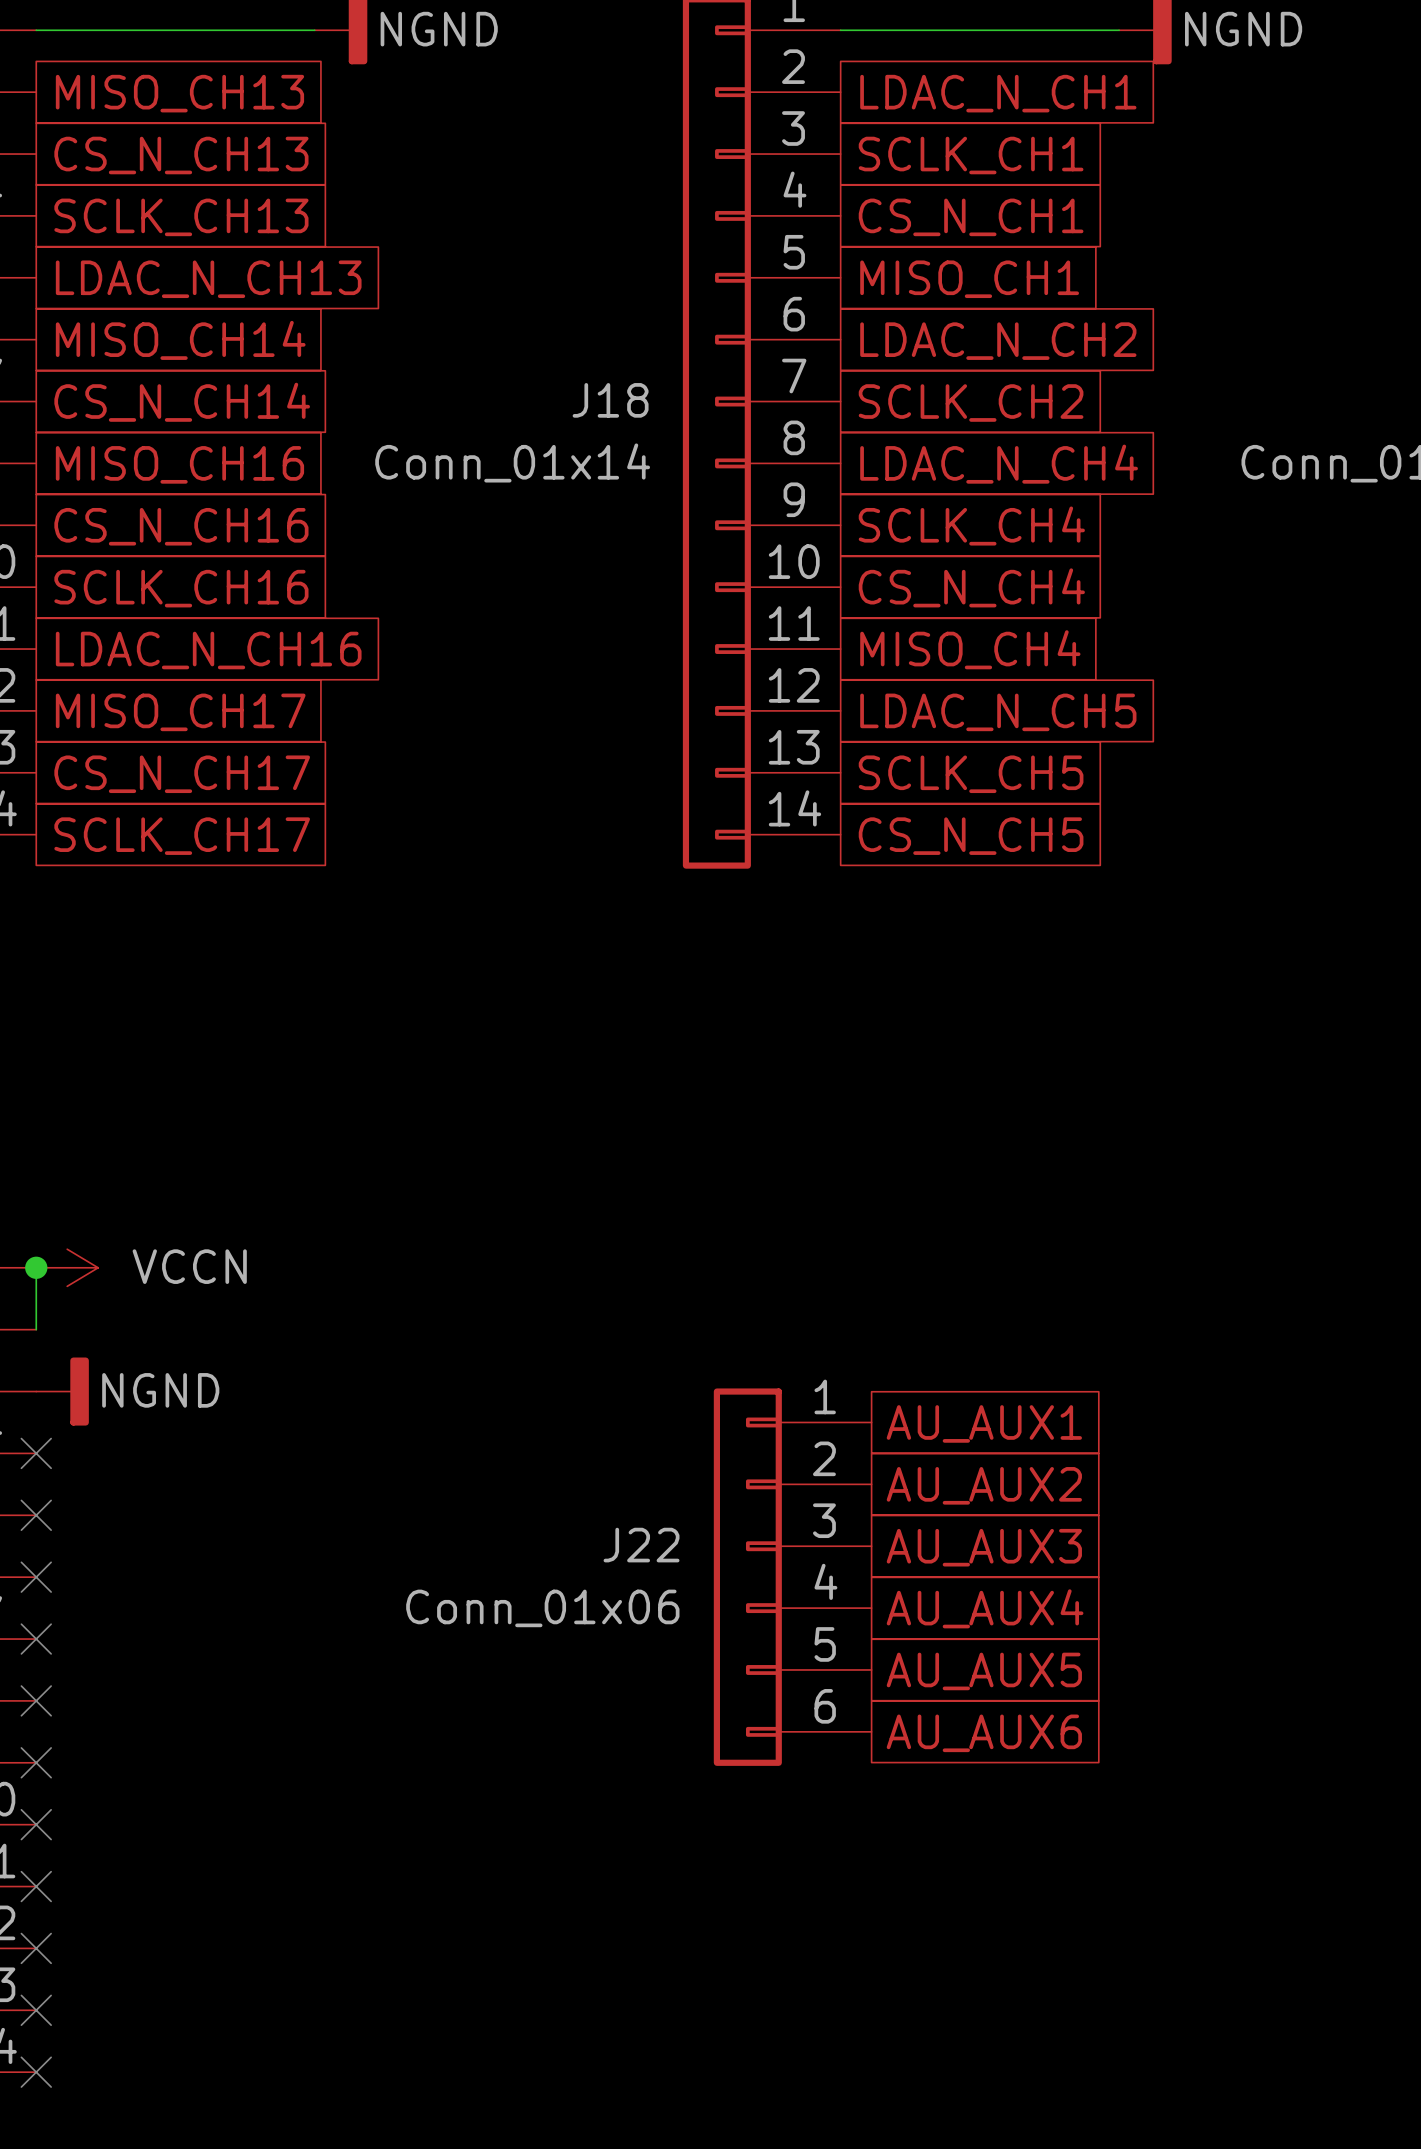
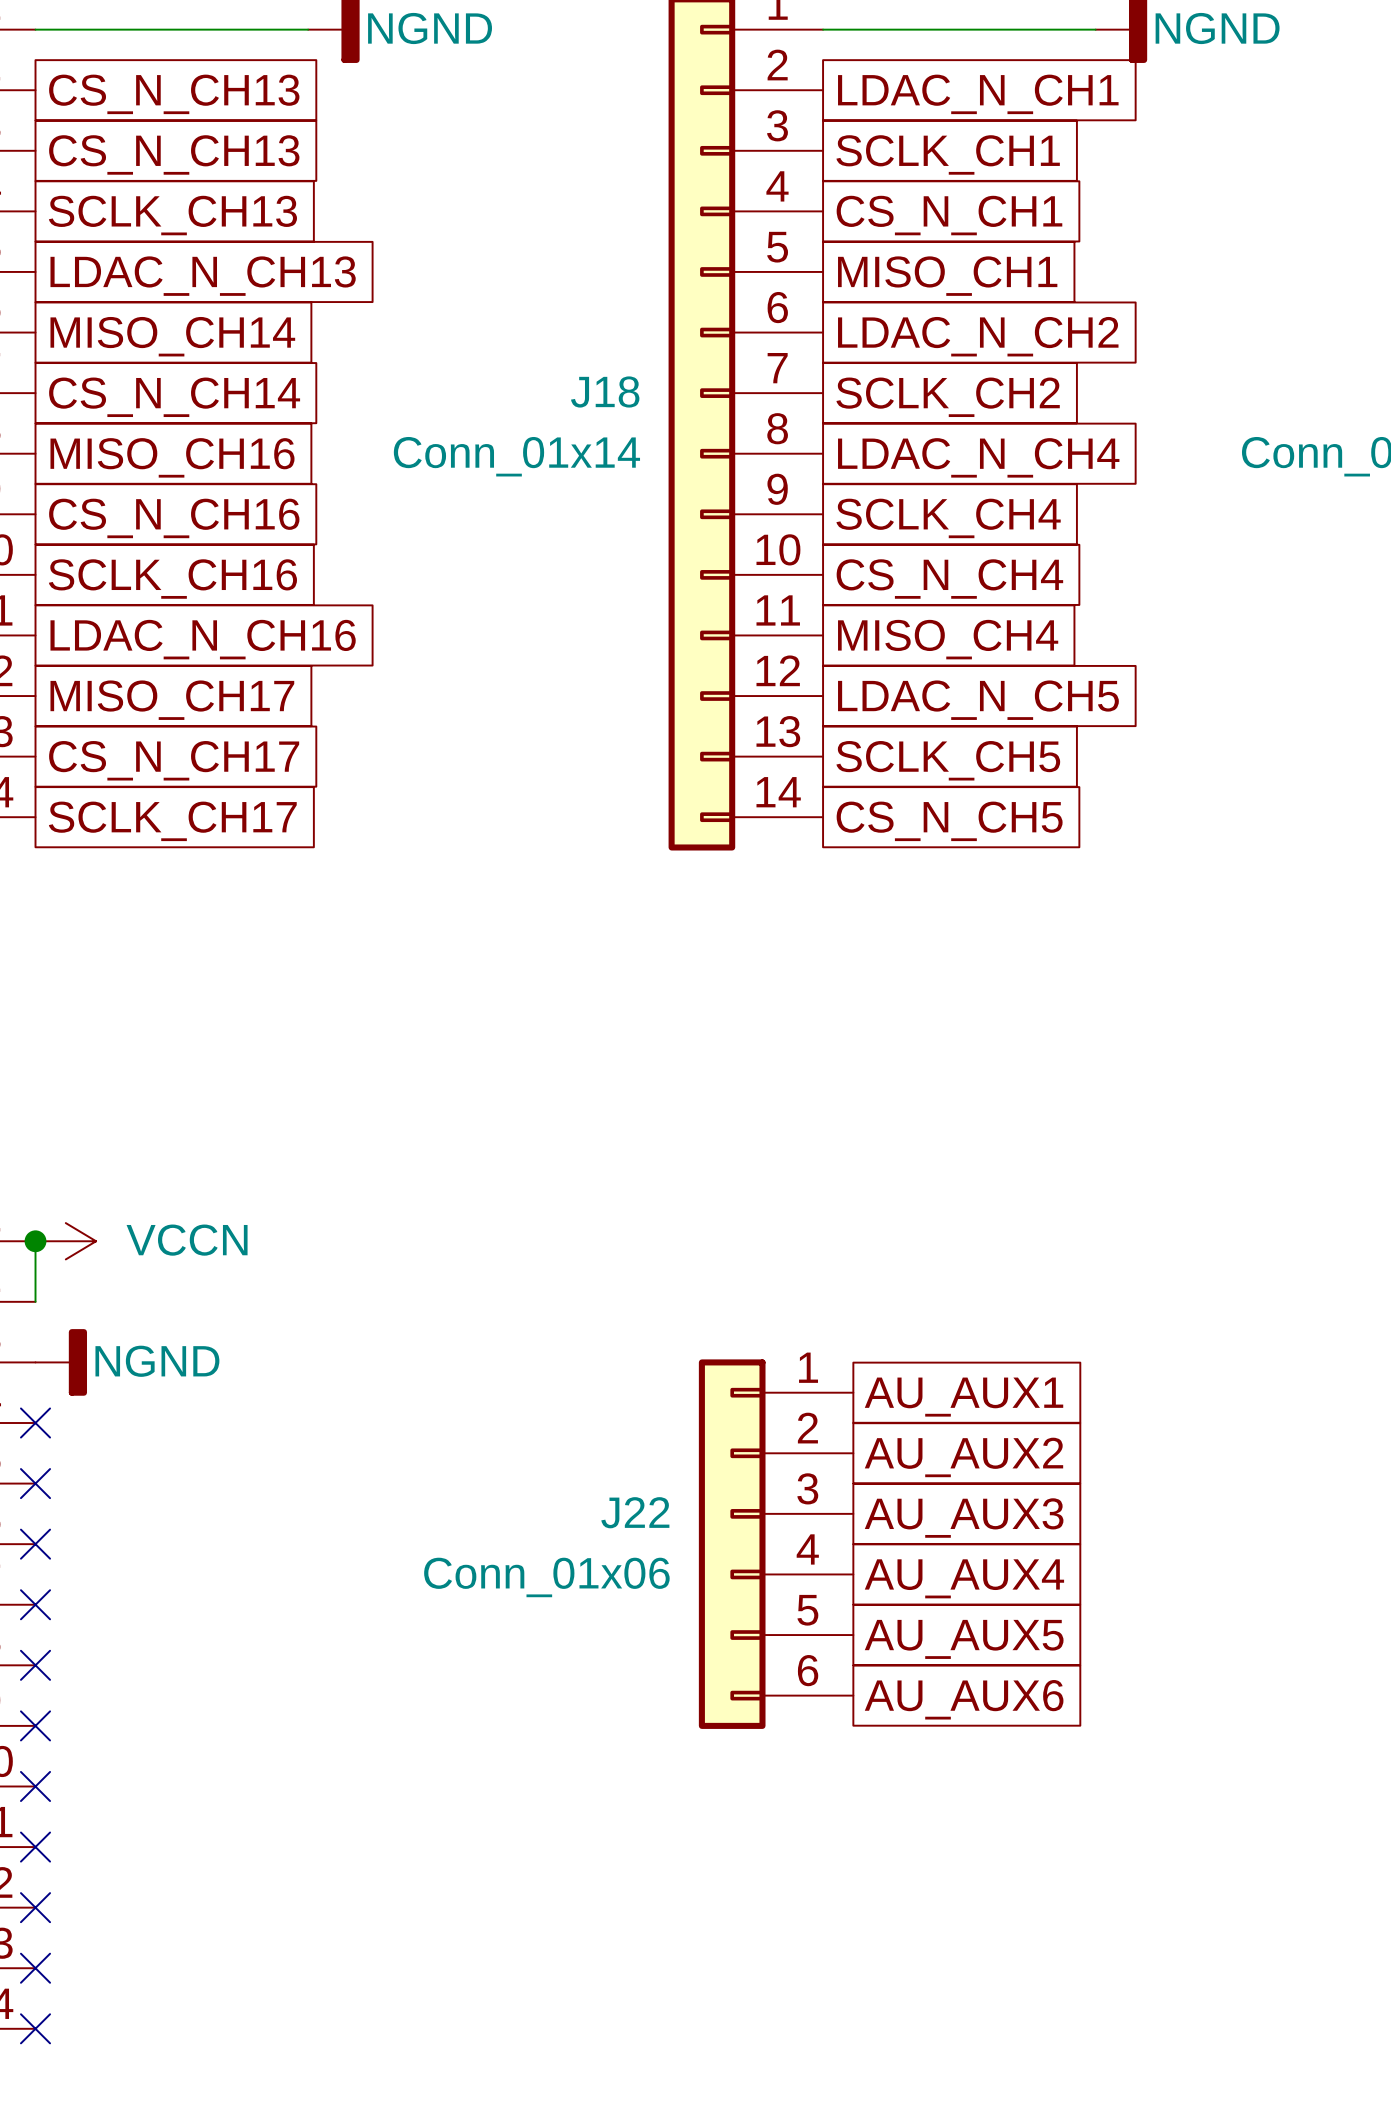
global label: MISO_CH13 (179, 93) -> CS_N_CH13 (174, 94)

